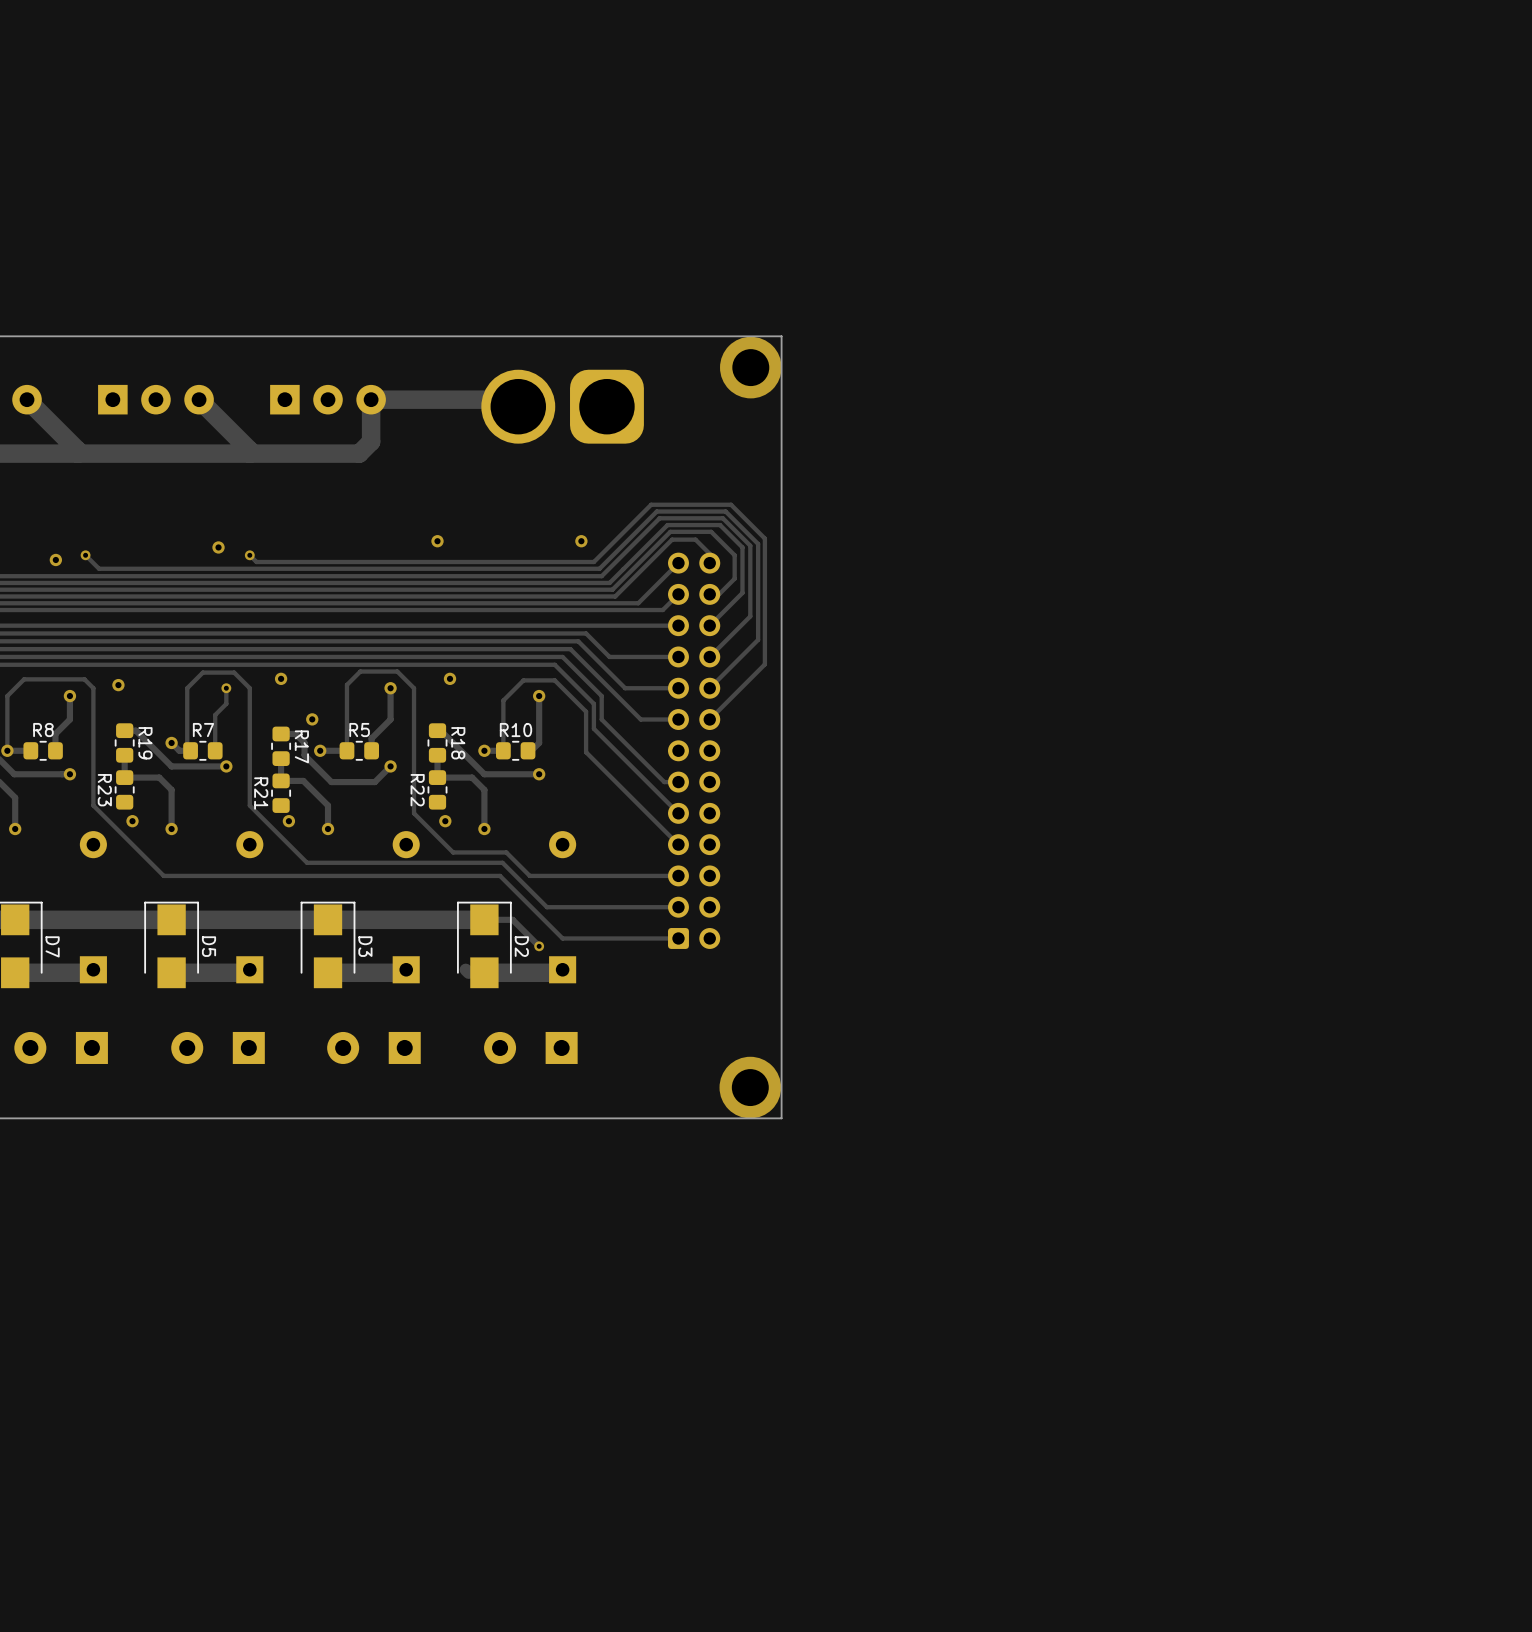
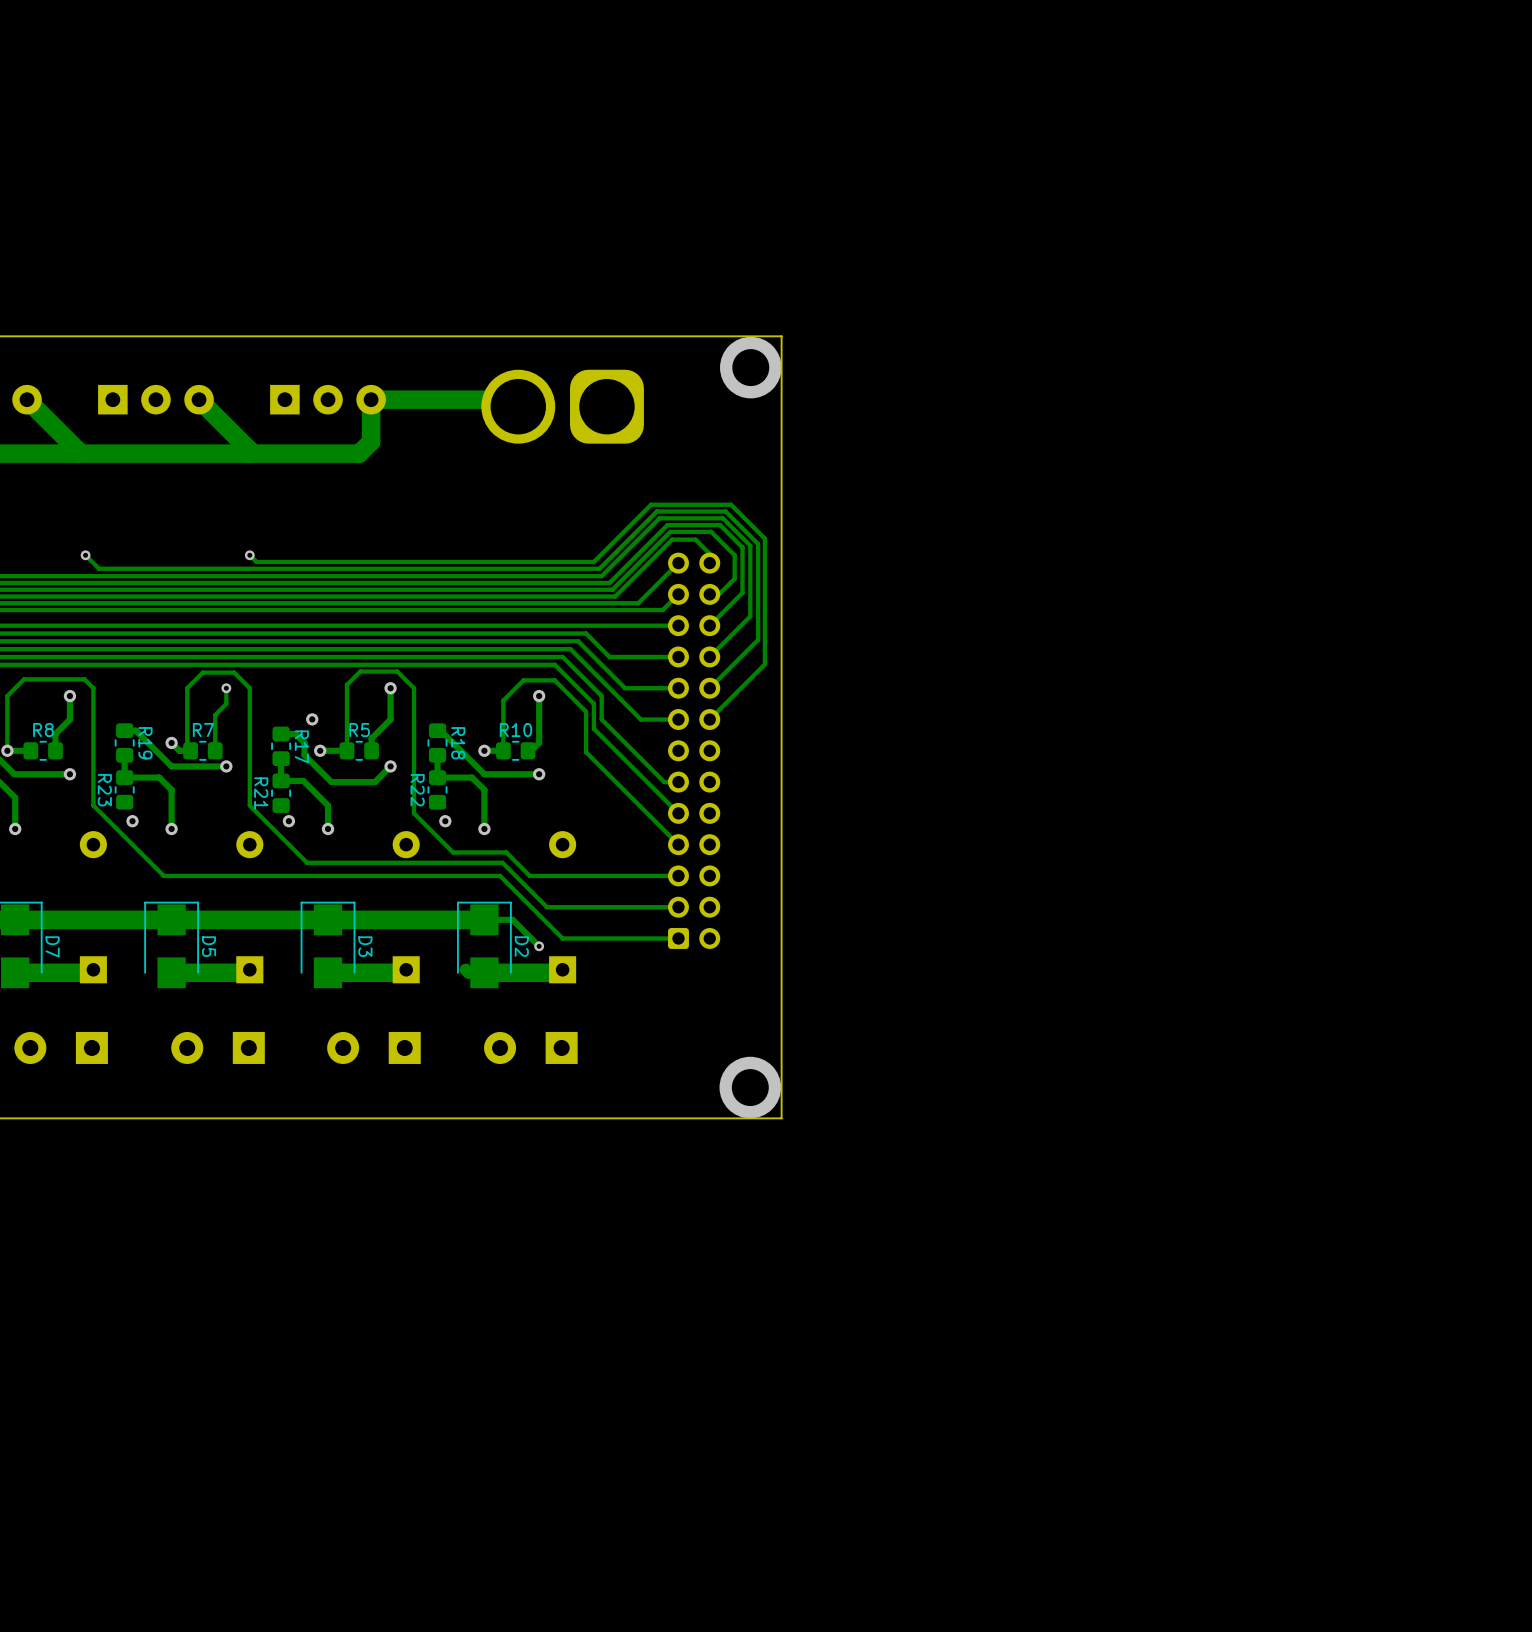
via: (437, 541) -> none
via: (581, 541) -> none
via: (218, 547) -> none
via: (55, 559) -> none
via: (281, 678) -> none
via: (450, 678) -> none
via: (118, 685) -> none

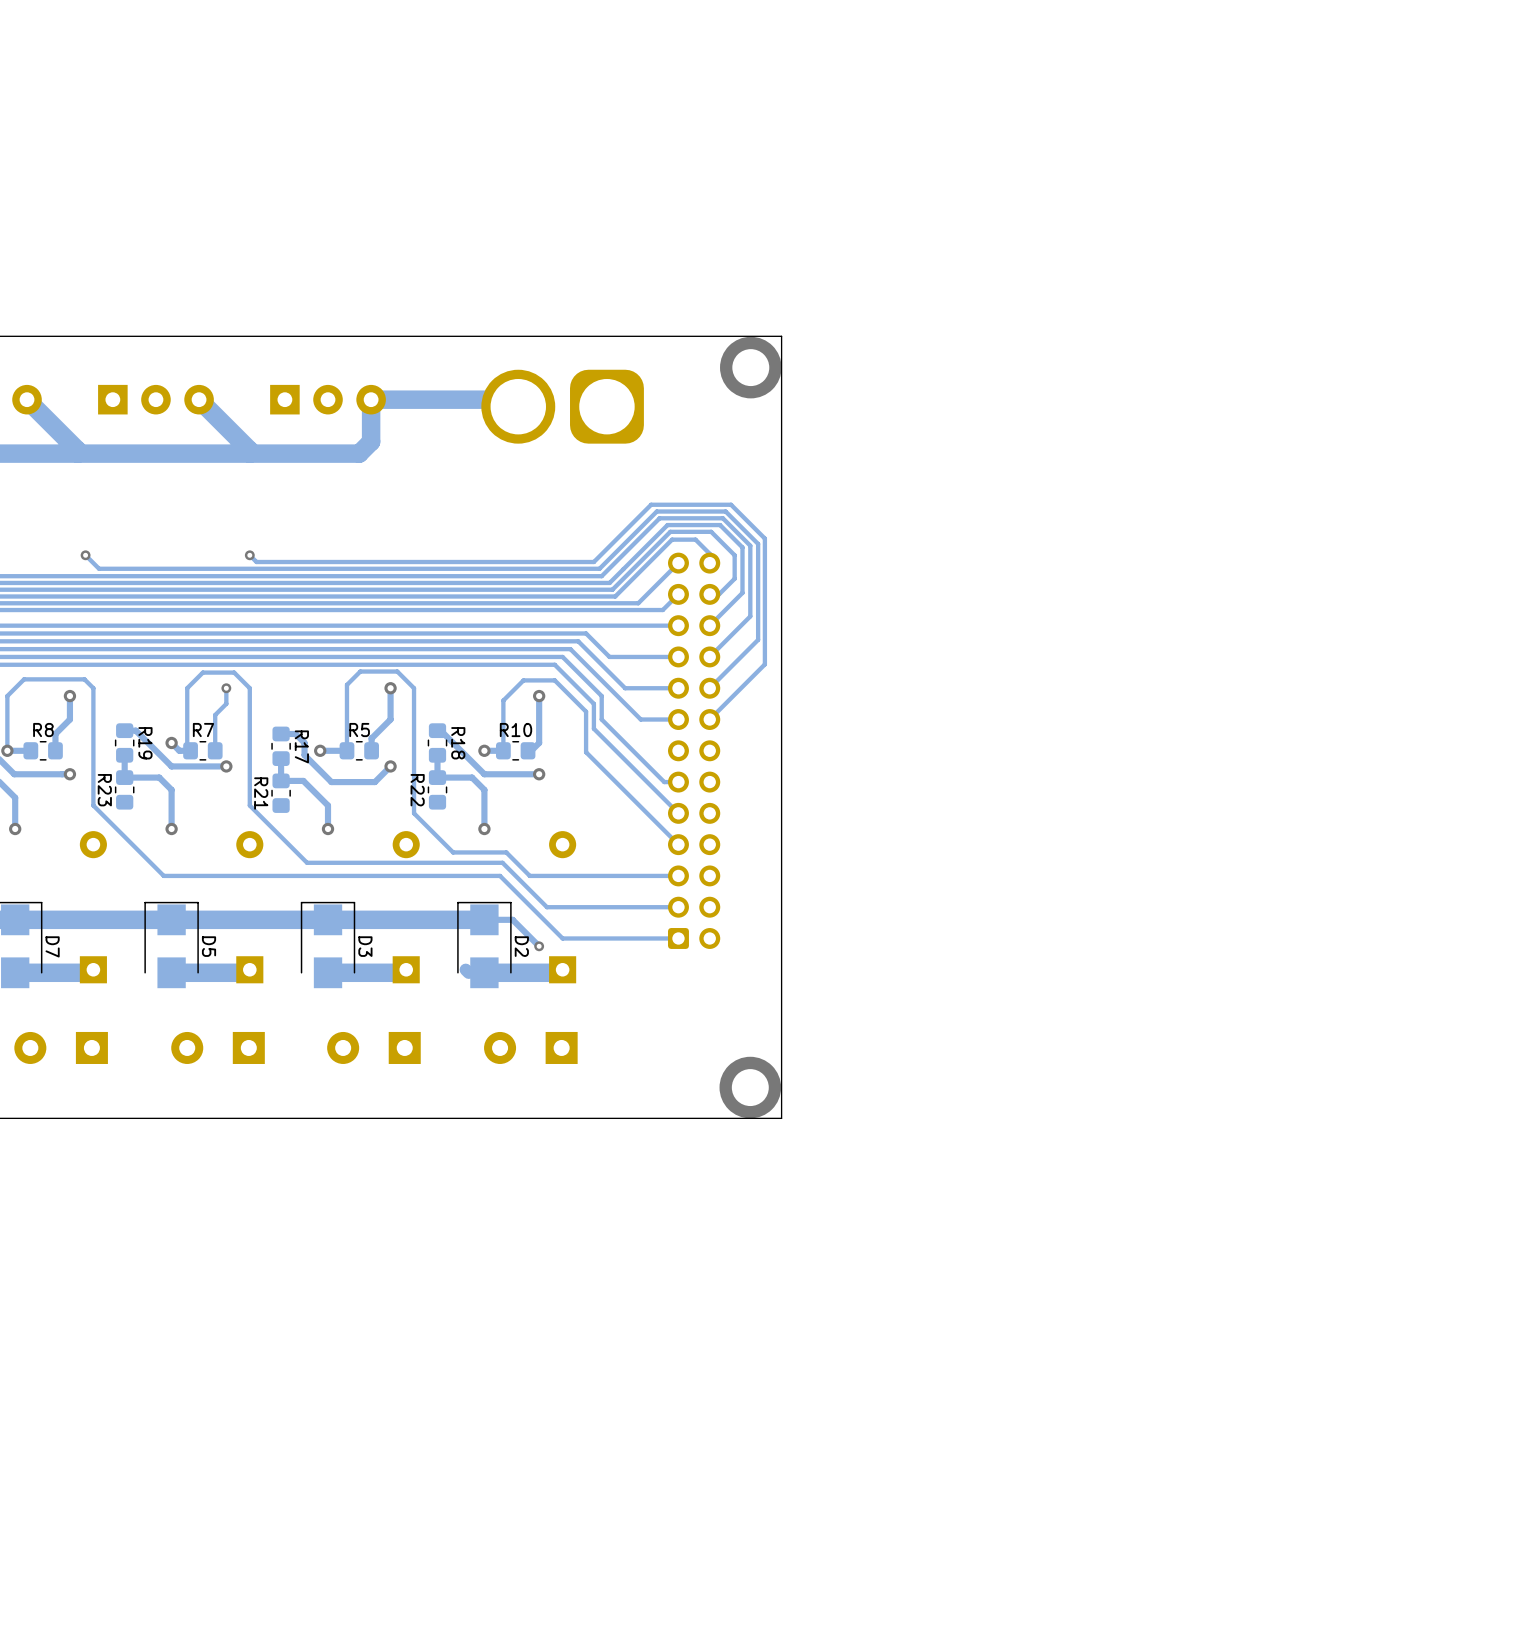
via: (312, 719) -> none
via: (132, 821) -> none
via: (288, 821) -> none
via: (445, 821) -> none

